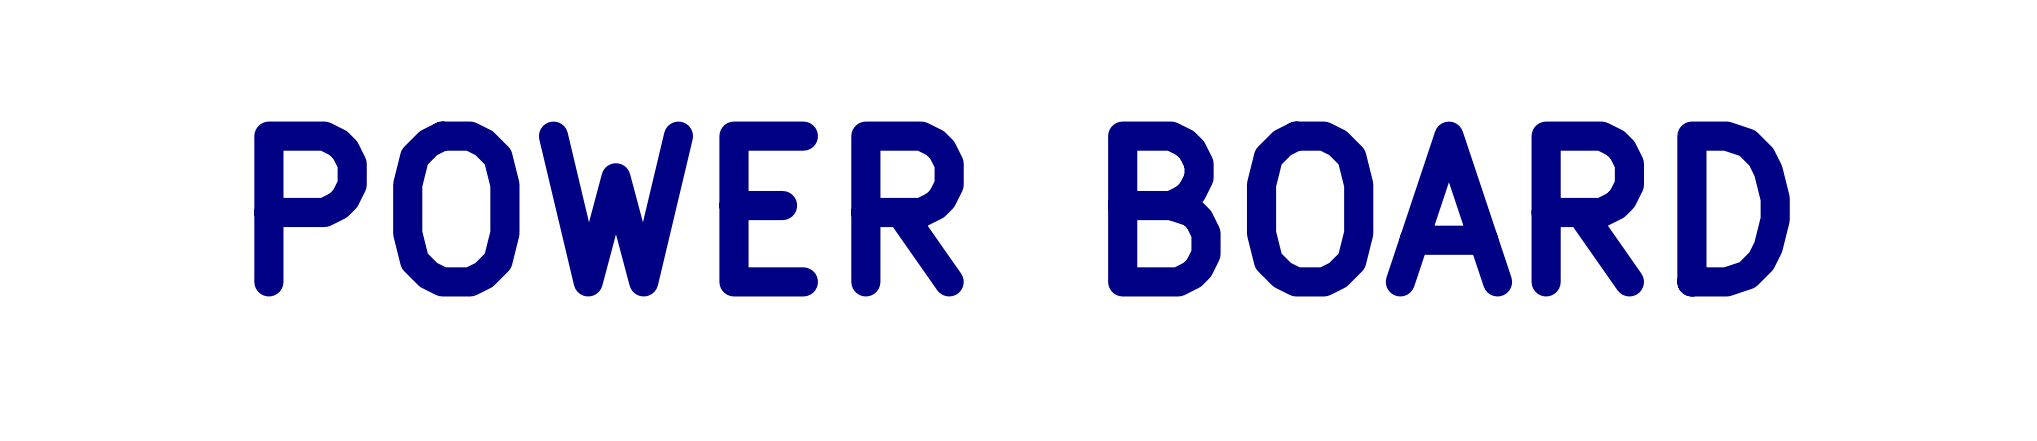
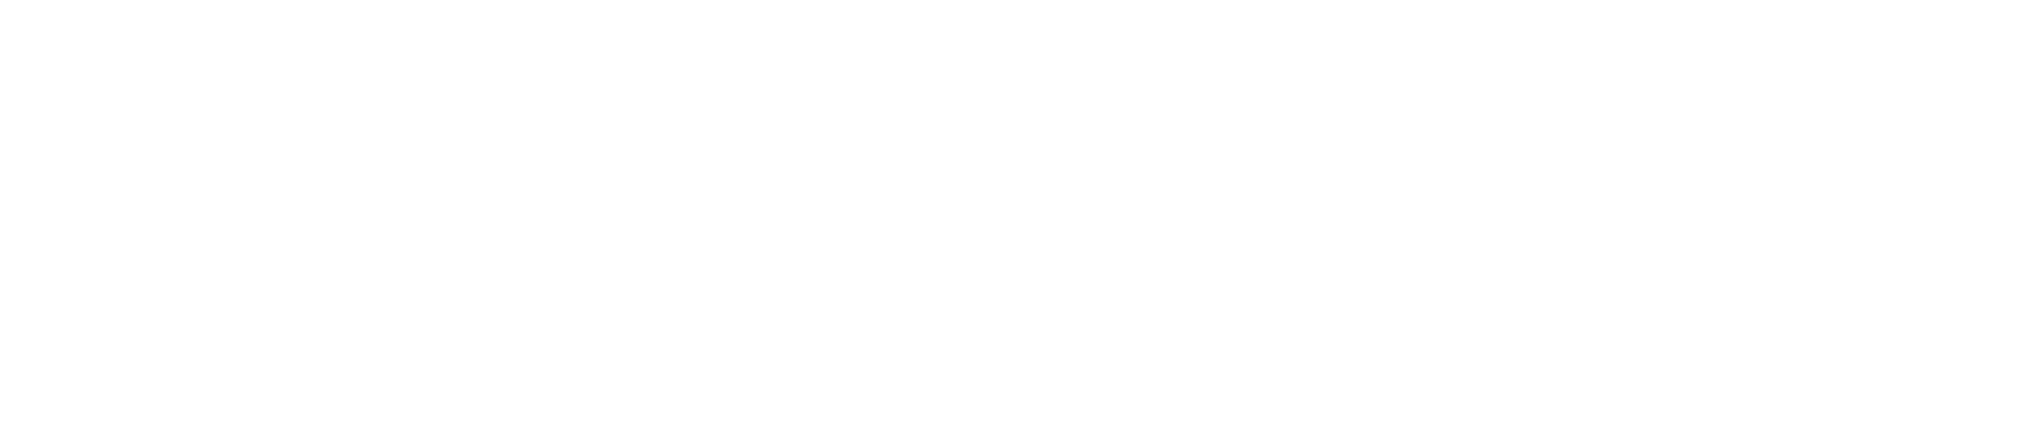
text: POWER BOARD (1022, 209) -> none

